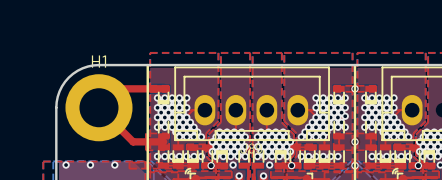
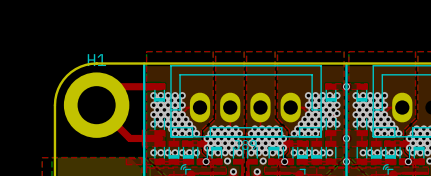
via: (66, 165) -> none
via: (90, 165) -> none
via: (114, 165) -> none

